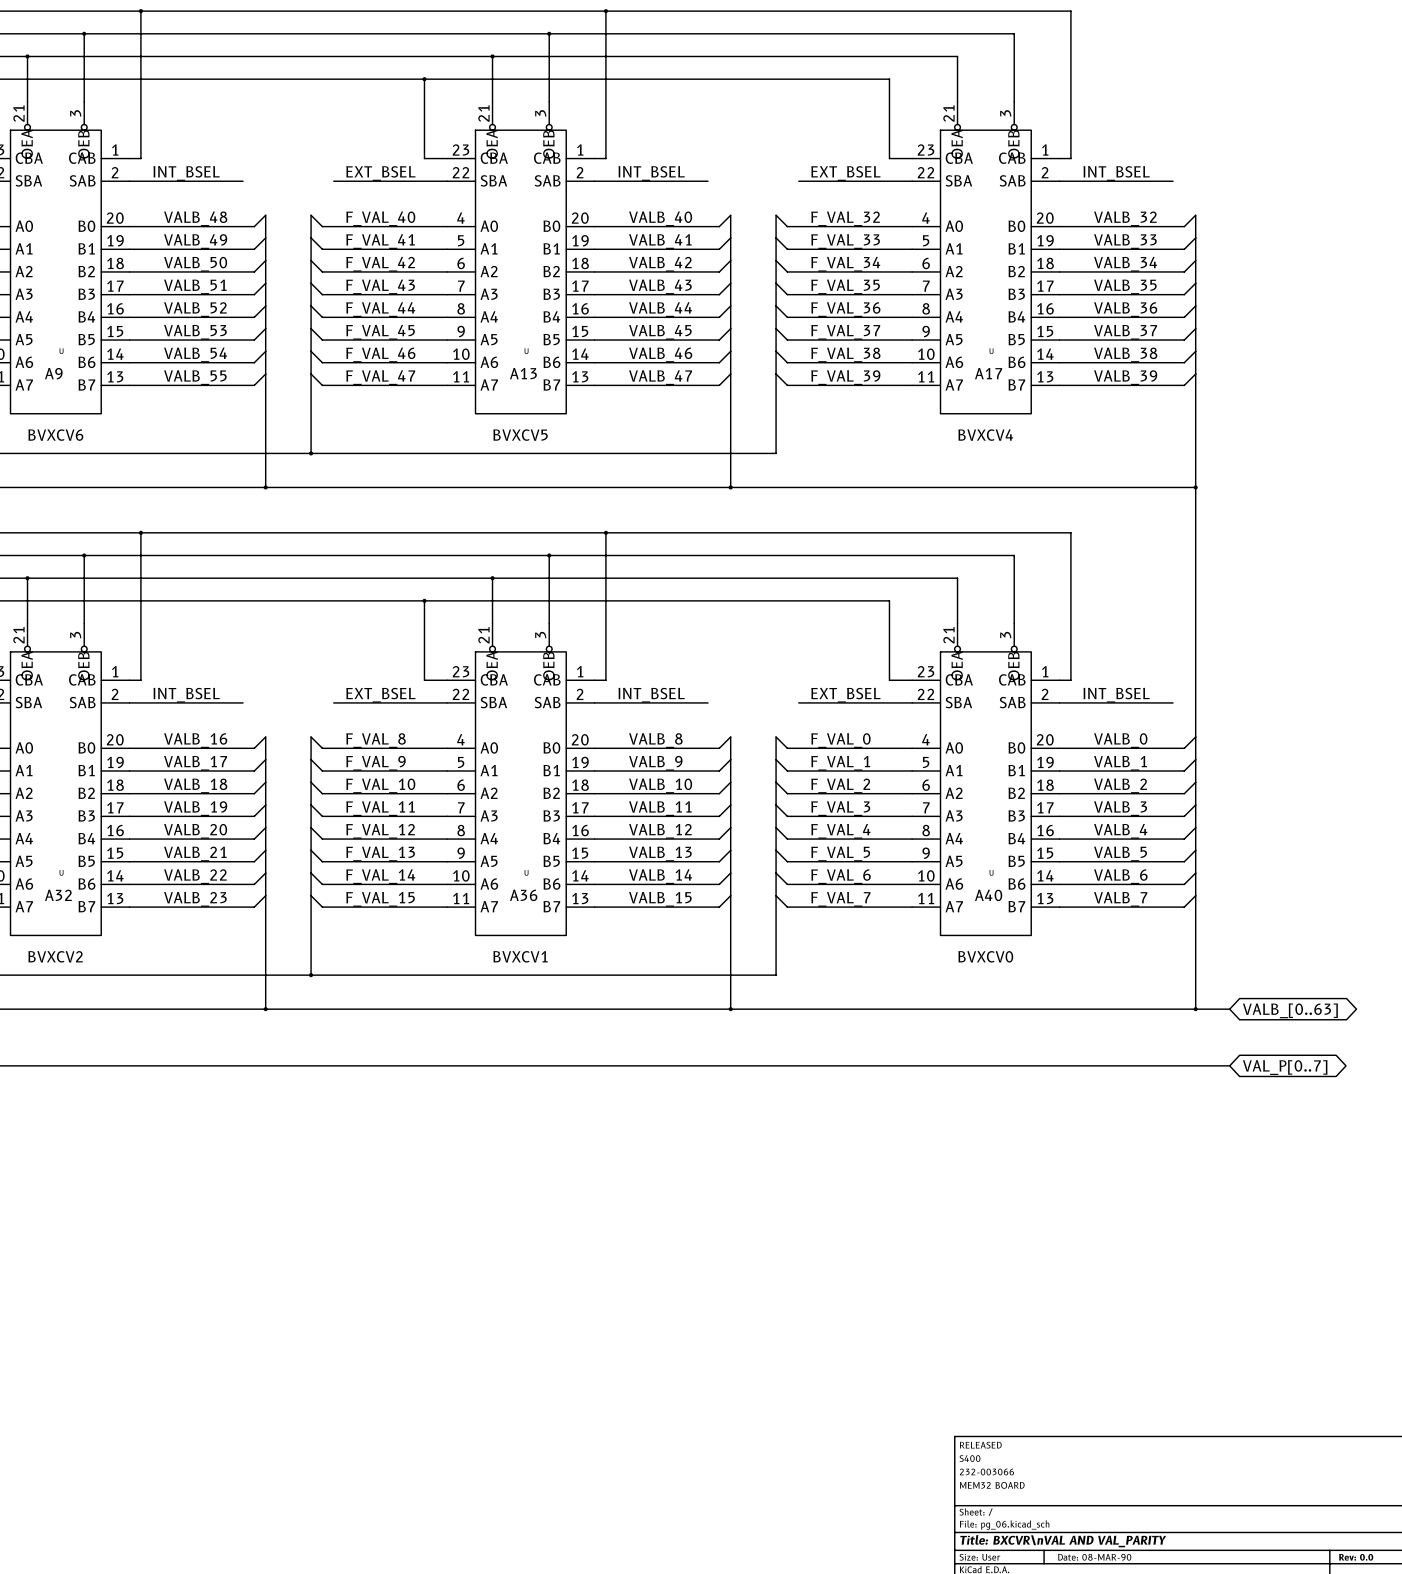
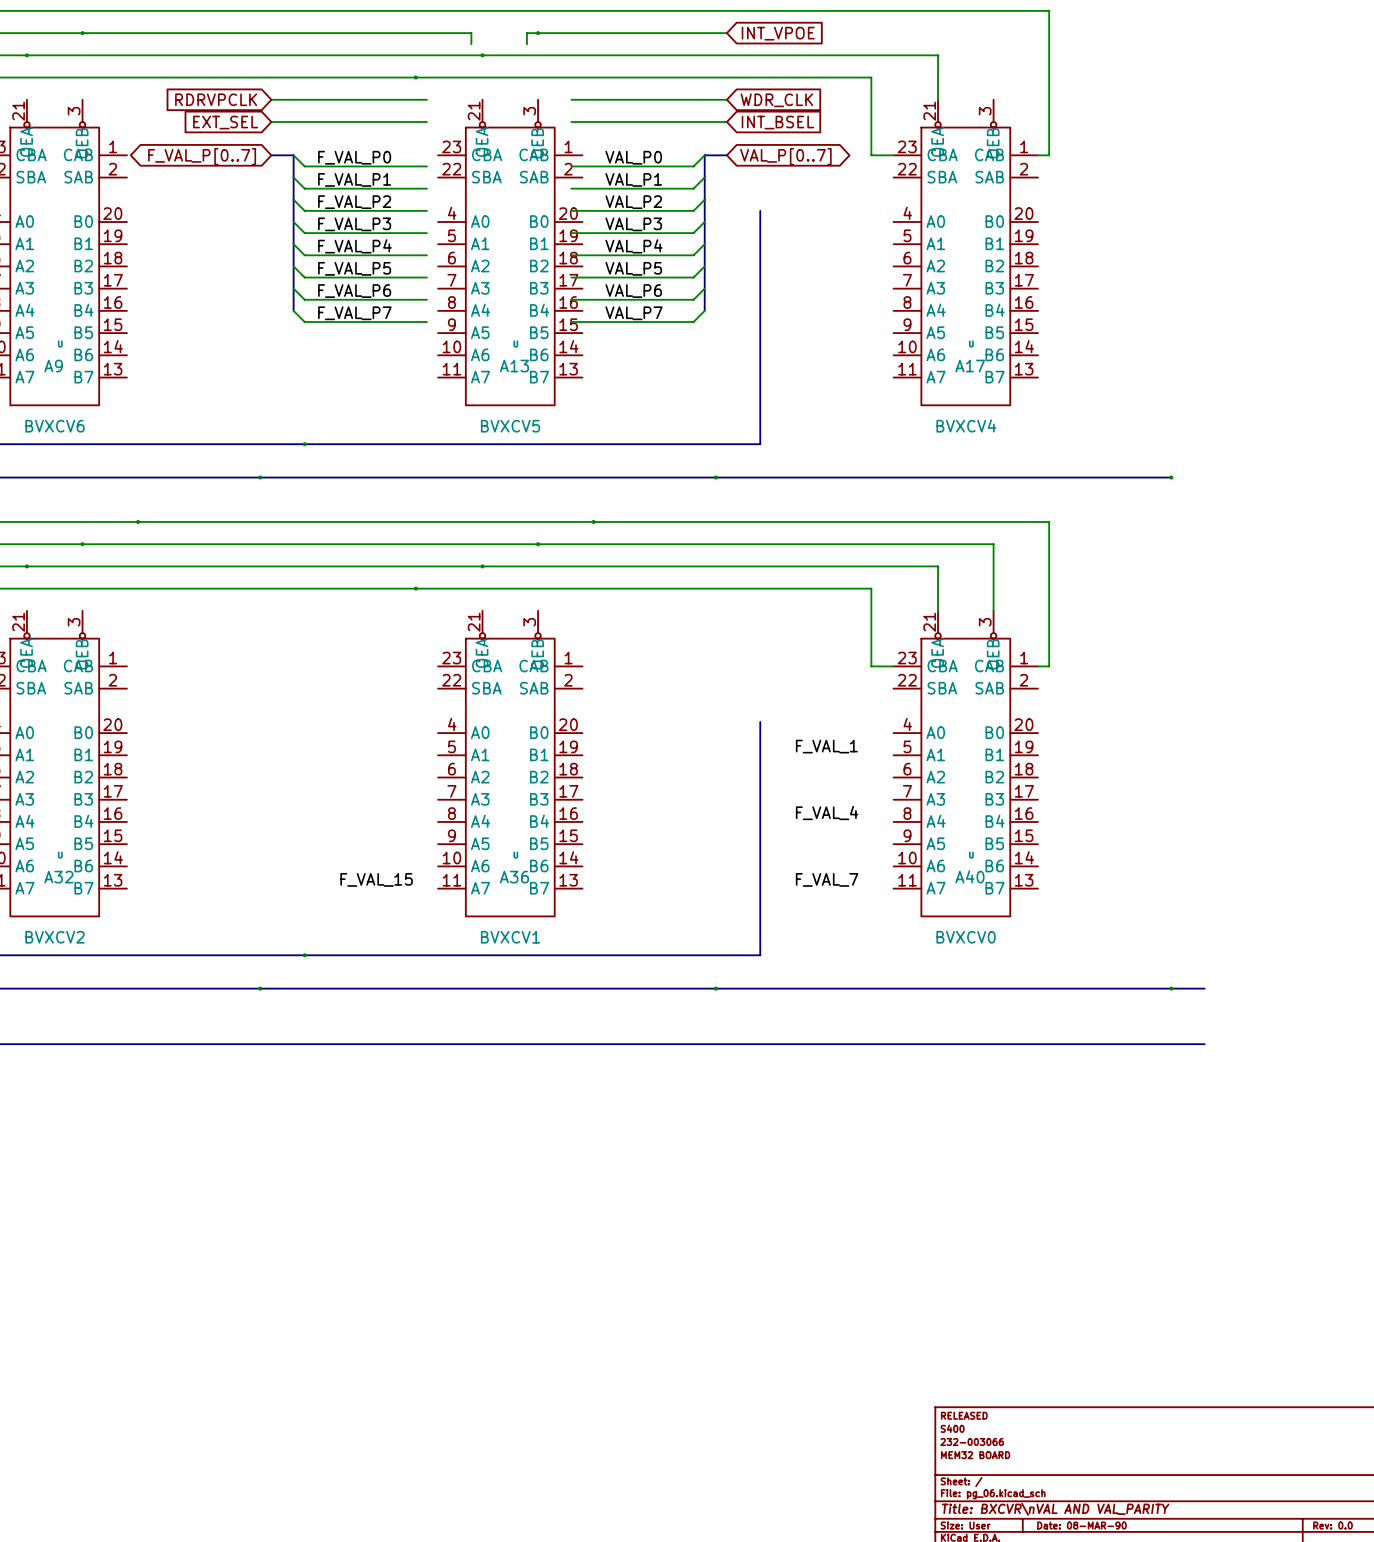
wire: (140, 11) (140, 158) (129, 158) -> none
junction: (140, 11) -> none
wire: (605, 11) (605, 158) (594, 158) -> none
junction: (605, 11) -> none
wire: (84, 33) (84, 101) -> none
wire: (481, 33) (537, 33) -> (471, 33) (471, 44)
wire: none -> (526, 33) (526, 44)
wire: (549, 33) (549, 101) -> none
wire: (742, 33) (1014, 33) (1014, 101) -> none
global label: none -> INT_VPOE (778, 33)
wire: (27, 56) (27, 101) -> none
wire: (492, 56) (492, 101) -> none
wire: (424, 79) (424, 158) (447, 158) -> none
global label: none -> RDRVPCLK (216, 99)
wire: none -> (271, 99) (426, 99)
wire: none -> (571, 99) (726, 99)
global label: none -> WDR_CLK (776, 100)
wire: none -> (271, 121) (426, 121)
wire: none -> (571, 121) (726, 121)
global label: none -> EXT_SEL (225, 122)
global label: none -> INT_BSEL (777, 122)
bus: none -> (271, 155) (293, 155) (293, 310)
bus: none -> (726, 155) (704, 155) (704, 310)
global label: none -> F_VAL_P[0..7] (202, 156)
global label: none -> VAL_P[0..7] (785, 156)
label: none -> F_VAL_P0 (354, 157)
label: none -> VAL_P0 (633, 157)
label: INT_BSEL (186, 173) -> none
label: EXT_BSEL (380, 173) -> none
label: INT_BSEL (651, 173) -> none
label: EXT_BSEL (845, 173) -> none
label: INT_BSEL (1116, 173) -> none
wire: (129, 181) (243, 181) -> none
wire: (333, 181) (447, 181) -> none
wire: (594, 181) (708, 181) -> none
wire: (798, 181) (912, 181) -> none
wire: (1059, 181) (1173, 181) -> none
label: none -> F_VAL_P1 (354, 179)
label: none -> VAL_P1 (633, 179)
label: none -> F_VAL_P2 (354, 202)
label: none -> VAL_P2 (633, 202)
wire: (265, 215) (254, 226) (129, 226) -> none
bus: (265, 215) (265, 487) -> none
wire: (311, 215) (322, 226) (447, 226) -> (293, 155) (304, 166) (426, 166)
bus: (311, 215) (311, 453) -> none
wire: (730, 215) (719, 226) (594, 226) -> (704, 155) (693, 166) (571, 166)
bus: (730, 215) (730, 487) -> none
wire: (776, 215) (787, 226) (912, 226) -> none
wire: (1195, 215) (1184, 226) (1059, 226) -> none
bus: (1195, 215) (1195, 1009) -> none
label: VALB_48 (195, 218) -> none
label: F_VAL_40 (380, 218) -> none
label: VALB_40 (660, 218) -> none
label: F_VAL_32 (845, 218) -> none
label: VALB_32 (1125, 218) -> none
label: none -> F_VAL_P3 (354, 224)
label: none -> VAL_P3 (633, 224)
wire: (265, 237) (254, 249) (129, 249) -> none
wire: (311, 237) (322, 249) (447, 249) -> (293, 177) (304, 188) (426, 188)
wire: (730, 237) (719, 249) (594, 249) -> (704, 177) (693, 188) (571, 188)
wire: (776, 237) (787, 249) (912, 249) -> none
wire: (1195, 237) (1184, 249) (1059, 249) -> none
label: VALB_49 (195, 241) -> none
label: F_VAL_41 (380, 241) -> none
label: VALB_41 (660, 241) -> none
label: F_VAL_33 (845, 241) -> none
label: VALB_33 (1125, 241) -> none
label: none -> F_VAL_P4 (354, 246)
label: none -> VAL_P4 (633, 246)
wire: (265, 260) (254, 271) (129, 271) -> none
wire: (311, 260) (322, 271) (447, 271) -> (293, 199) (304, 210) (426, 210)
wire: (730, 260) (719, 271) (594, 271) -> (704, 199) (693, 210) (571, 210)
wire: (776, 260) (787, 271) (912, 271) -> none
wire: (1195, 260) (1184, 271) (1059, 271) -> none
label: VALB_50 (195, 264) -> none
label: F_VAL_42 (380, 264) -> none
label: VALB_42 (660, 264) -> none
label: F_VAL_34 (845, 264) -> none
label: VALB_34 (1125, 264) -> none
label: none -> F_VAL_P5 (354, 268)
label: none -> VAL_P5 (633, 268)
wire: (265, 283) (254, 294) (129, 294) -> none
wire: (311, 283) (322, 294) (447, 294) -> (293, 221) (304, 233) (426, 233)
wire: (730, 283) (719, 294) (594, 294) -> (704, 221) (693, 233) (571, 233)
wire: (776, 283) (787, 294) (912, 294) -> none
wire: (1195, 283) (1184, 294) (1059, 294) -> none
label: VALB_51 (195, 286) -> none
label: F_VAL_43 (380, 286) -> none
label: VALB_43 (660, 286) -> none
label: F_VAL_35 (845, 286) -> none
label: VALB_35 (1125, 286) -> none
label: none -> F_VAL_P6 (354, 291)
label: none -> VAL_P6 (633, 291)
wire: (265, 305) (254, 317) (129, 317) -> none
wire: (311, 305) (322, 317) (447, 317) -> (293, 244) (304, 255) (426, 255)
wire: (730, 305) (719, 317) (594, 317) -> (704, 244) (693, 255) (571, 255)
wire: (776, 305) (787, 317) (912, 317) -> none
wire: (1195, 305) (1184, 317) (1059, 317) -> none
label: VALB_52 (195, 309) -> none
label: F_VAL_44 (380, 309) -> none
label: VALB_44 (660, 309) -> none
label: F_VAL_36 (845, 309) -> none
label: VALB_36 (1125, 309) -> none
label: none -> F_VAL_P7 (354, 313)
label: none -> VAL_P7 (633, 313)
wire: (265, 328) (254, 340) (129, 340) -> none
wire: (311, 328) (322, 340) (447, 340) -> (293, 266) (304, 277) (426, 277)
wire: (730, 328) (719, 340) (594, 340) -> (704, 266) (693, 277) (571, 277)
wire: (776, 328) (787, 340) (912, 340) -> none
wire: (1195, 328) (1184, 340) (1059, 340) -> none
label: VALB_53 (195, 332) -> none
label: F_VAL_45 (380, 332) -> none
label: VALB_45 (660, 332) -> none
label: F_VAL_37 (845, 332) -> none
label: VALB_37 (1125, 332) -> none
wire: (265, 351) (254, 362) (129, 362) -> none
wire: (311, 351) (322, 362) (447, 362) -> (293, 288) (304, 299) (426, 299)
wire: (730, 351) (719, 362) (594, 362) -> (704, 288) (693, 299) (571, 299)
wire: (776, 351) (787, 362) (912, 362) -> none
wire: (1195, 351) (1184, 362) (1059, 362) -> none
label: VALB_54 (195, 354) -> none
label: F_VAL_46 (380, 354) -> none
label: VALB_46 (660, 354) -> none
label: F_VAL_38 (845, 354) -> none
label: VALB_38 (1125, 354) -> none
wire: (265, 374) (254, 385) (129, 385) -> none
wire: (311, 374) (322, 385) (447, 385) -> (293, 310) (304, 321) (426, 321)
wire: (730, 374) (719, 385) (594, 385) -> (704, 310) (693, 321) (571, 321)
wire: (776, 374) (787, 385) (912, 385) -> none
wire: (1195, 374) (1184, 385) (1059, 385) -> none
label: VALB_55 (195, 377) -> none
label: F_VAL_47 (380, 377) -> none
label: VALB_47 (660, 377) -> none
label: F_VAL_39 (845, 377) -> none
label: VALB_39 (1125, 377) -> none
wire: (140, 532) (140, 680) (129, 680) -> none
wire: (605, 532) (605, 680) (594, 680) -> none
wire: (84, 555) (84, 623) -> none
wire: (549, 555) (549, 623) -> none
wire: (27, 578) (27, 623) -> none
wire: (492, 578) (492, 623) -> none
wire: (424, 600) (424, 680) (447, 680) -> none
label: INT_BSEL (186, 695) -> none
label: EXT_BSEL (380, 695) -> none
label: INT_BSEL (651, 695) -> none
label: EXT_BSEL (845, 695) -> none
label: INT_BSEL (1116, 695) -> none
wire: (129, 702) (243, 702) -> none
wire: (333, 702) (447, 702) -> none
wire: (594, 702) (708, 702) -> none
wire: (798, 702) (912, 702) -> none
wire: (1059, 702) (1173, 702) -> none
wire: (265, 736) (254, 748) (129, 748) -> none
bus: (265, 736) (265, 1009) -> none
wire: (311, 736) (322, 748) (447, 748) -> none
bus: (311, 736) (311, 975) -> none
wire: (730, 736) (719, 748) (594, 748) -> none
bus: (730, 736) (730, 1009) -> none
wire: (776, 736) (787, 748) (912, 748) -> none
wire: (1195, 736) (1184, 748) (1059, 748) -> none
label: VALB_16 (195, 740) -> none
label: F_VAL_8 (376, 740) -> none
label: VALB_8 (655, 740) -> none
label: F_VAL_0 (840, 740) -> none
label: VALB_0 (1120, 740) -> none
wire: (265, 759) (254, 770) (129, 770) -> none
wire: (311, 759) (322, 770) (447, 770) -> none
wire: (730, 759) (719, 770) (594, 770) -> none
wire: (776, 759) (787, 770) (912, 770) -> none
wire: (1195, 759) (1184, 770) (1059, 770) -> none
label: VALB_17 (195, 763) -> none
label: F_VAL_9 (375, 763) -> none
label: VALB_9 (655, 763) -> none
label: VALB_1 (1120, 763) -> none
wire: (265, 782) (254, 793) (129, 793) -> none
wire: (311, 782) (322, 793) (447, 793) -> none
wire: (730, 782) (719, 793) (594, 793) -> none
wire: (776, 782) (787, 793) (912, 793) -> none
wire: (1195, 782) (1184, 793) (1059, 793) -> none
label: VALB_18 (195, 785) -> none
label: F_VAL_10 (380, 785) -> none
label: VALB_10 (660, 785) -> none
label: F_VAL_2 (840, 785) -> none
label: VALB_2 (1120, 785) -> none
wire: (265, 805) (254, 816) (129, 816) -> none
wire: (311, 805) (322, 816) (447, 816) -> none
wire: (730, 805) (719, 816) (594, 816) -> none
wire: (776, 805) (787, 816) (912, 816) -> none
wire: (1195, 805) (1184, 816) (1059, 816) -> none
label: VALB_19 (195, 808) -> none
label: F_VAL_11 (380, 808) -> none
label: VALB_11 (660, 808) -> none
label: F_VAL_3 (840, 808) -> none
label: VALB_3 (1120, 808) -> none
wire: (265, 827) (254, 839) (129, 839) -> none
wire: (311, 827) (322, 839) (447, 839) -> none
wire: (730, 827) (719, 839) (594, 839) -> none
wire: (776, 827) (787, 839) (912, 839) -> none
wire: (1195, 827) (1184, 839) (1059, 839) -> none
label: VALB_20 (195, 831) -> none
label: F_VAL_12 (380, 831) -> none
label: VALB_12 (660, 831) -> none
label: VALB_4 (1120, 831) -> none
wire: (265, 850) (254, 861) (129, 861) -> none
wire: (311, 850) (322, 861) (447, 861) -> none
wire: (730, 850) (719, 861) (594, 861) -> none
wire: (776, 850) (787, 861) (912, 861) -> none
wire: (1195, 850) (1184, 861) (1059, 861) -> none
label: VALB_21 (195, 853) -> none
label: F_VAL_13 (380, 853) -> none
label: VALB_13 (660, 853) -> none
label: F_VAL_5 (840, 853) -> none
label: VALB_5 (1120, 853) -> none
wire: (265, 873) (254, 884) (129, 884) -> none
wire: (311, 873) (322, 884) (447, 884) -> none
wire: (730, 873) (719, 884) (594, 884) -> none
wire: (776, 873) (787, 884) (912, 884) -> none
wire: (1195, 873) (1184, 884) (1059, 884) -> none
label: VALB_22 (195, 876) -> none
label: F_VAL_14 (380, 876) -> none
label: VALB_14 (660, 876) -> none
label: F_VAL_6 (841, 876) -> none
label: VALB_6 (1120, 876) -> none
wire: (265, 895) (254, 907) (129, 907) -> none
wire: (311, 895) (322, 907) (447, 907) -> none
wire: (730, 895) (719, 907) (594, 907) -> none
wire: (776, 895) (787, 907) (912, 907) -> none
wire: (1195, 895) (1184, 907) (1059, 907) -> none
label: VALB_23 (195, 899) -> none
label: VALB_15 (660, 899) -> none
label: VALB_7 (1120, 899) -> none
global label: VALB_[0..63] (1290, 1010) -> none
global label: VAL_P[0..7] (1285, 1067) -> none

